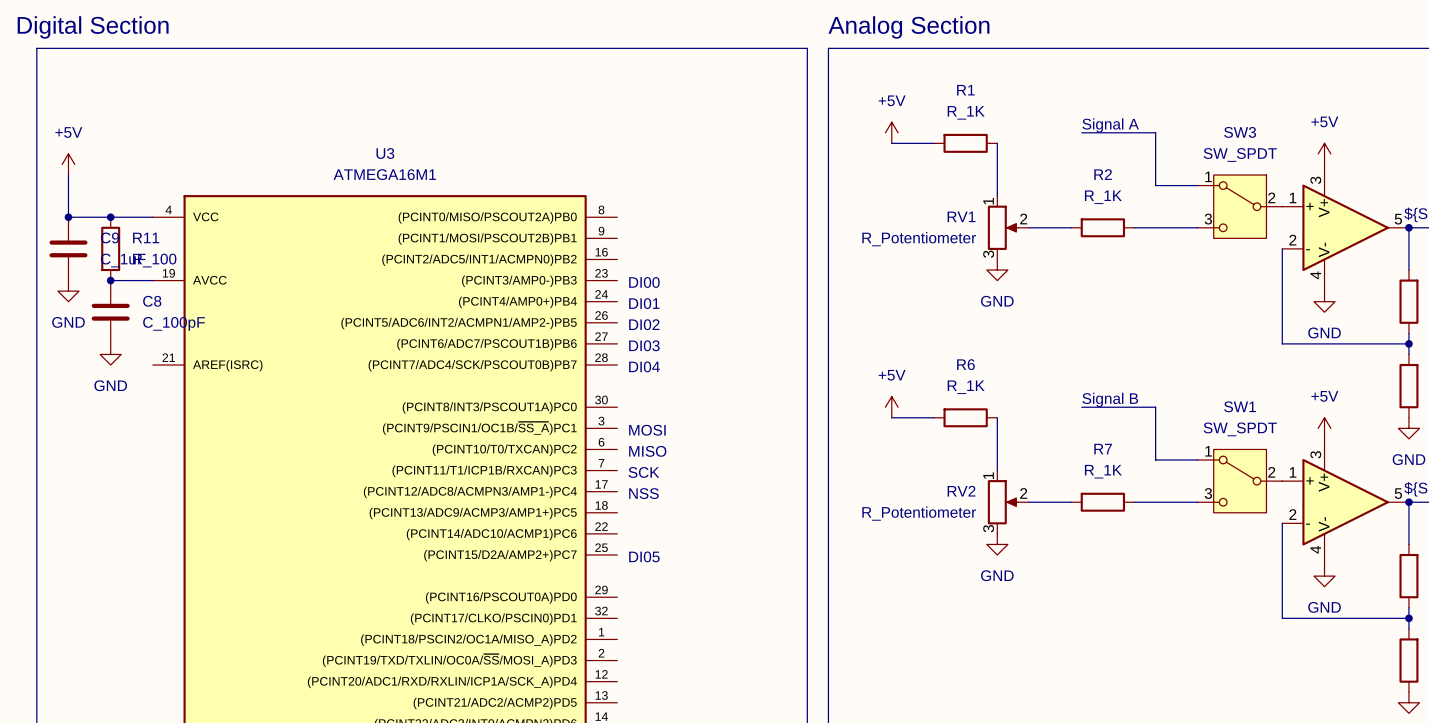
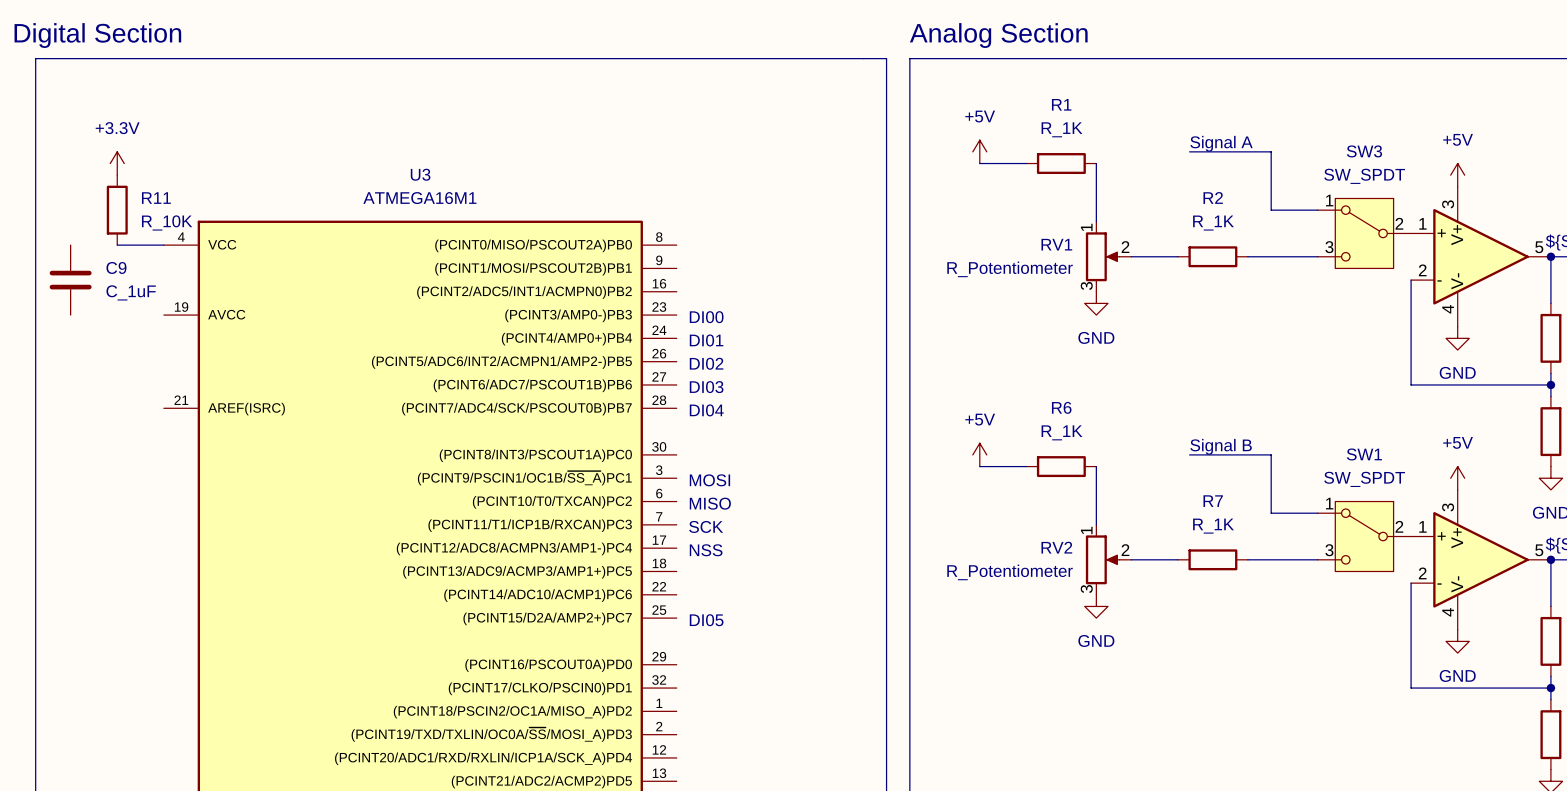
power symbol: none -> +3.3V (117, 163)
power symbol: +5V (68, 164) -> none
wire: (68, 175) (68, 217) (110, 217) -> none
junction: (68, 217) -> none
junction: (110, 217) -> none
R11 position: (110, 248) -> (117, 210)
R11 value: R_100 (154, 260) -> R_10K (167, 222)
wire: (110, 280) (152, 280) -> none
junction: (110, 280) -> none
power symbol: GND (68, 291) -> none
C8: C_100pF (110, 312) -> none
power symbol: GND (110, 354) -> none

